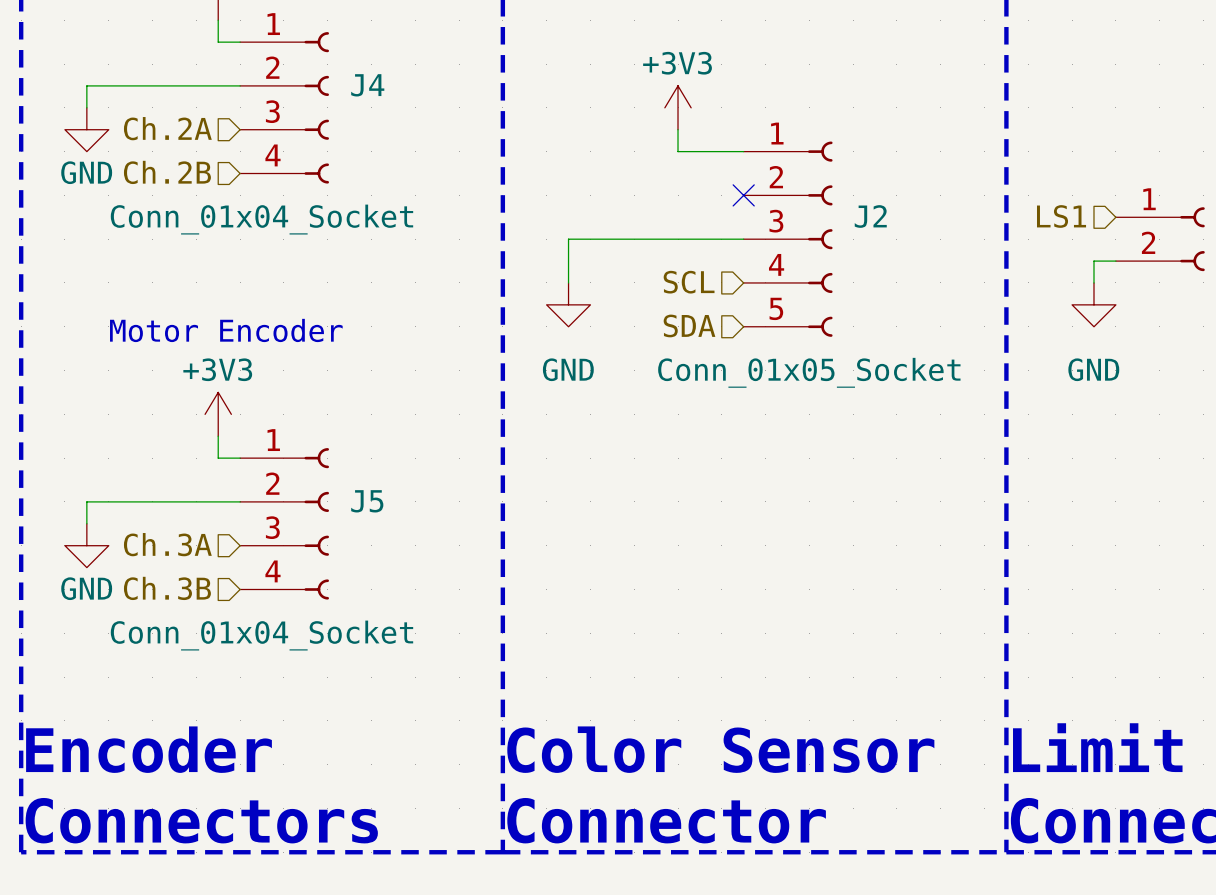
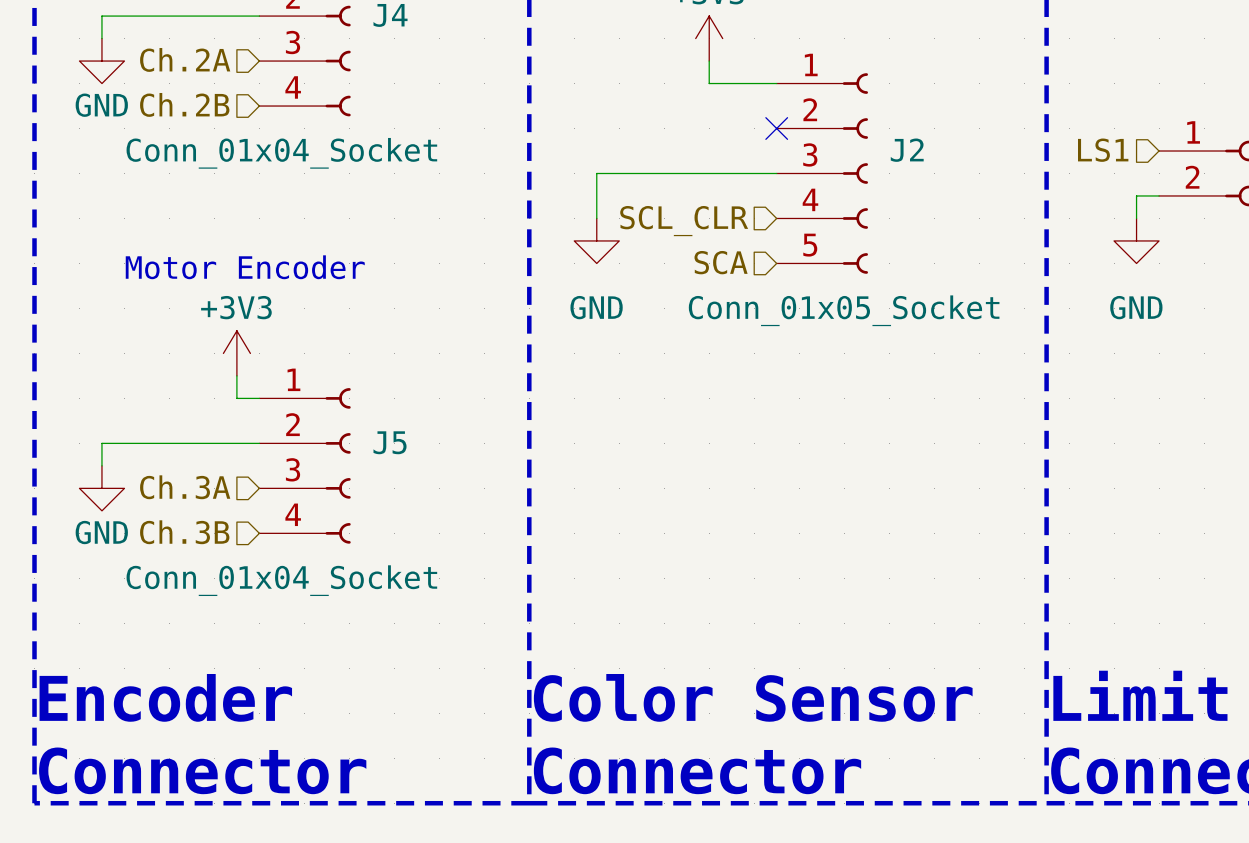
hierarchical label: SCL (689, 282) -> SCL_CLR (684, 221)
hierarchical label: SDA (689, 325) -> SCA (721, 262)
text: Connectors (201, 820) -> Connector (202, 770)

